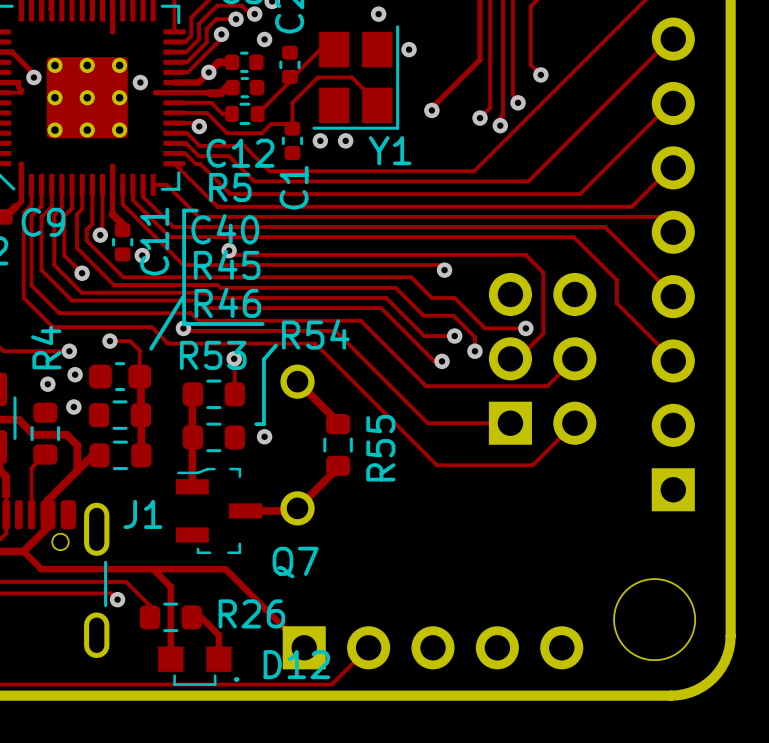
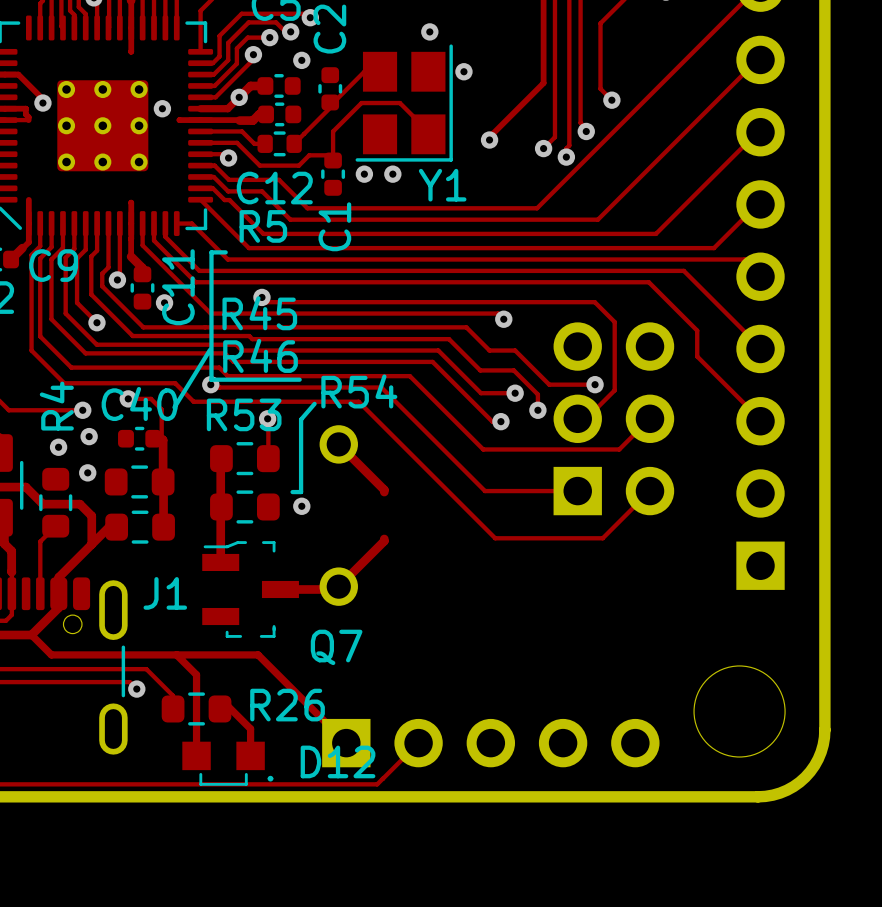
C40 name position: C40 (225, 229) -> C40 (139, 403)
C40 footprint: [89, 362, 152, 392] -> [118, 426, 162, 451]
R55: (338, 445) -> none

